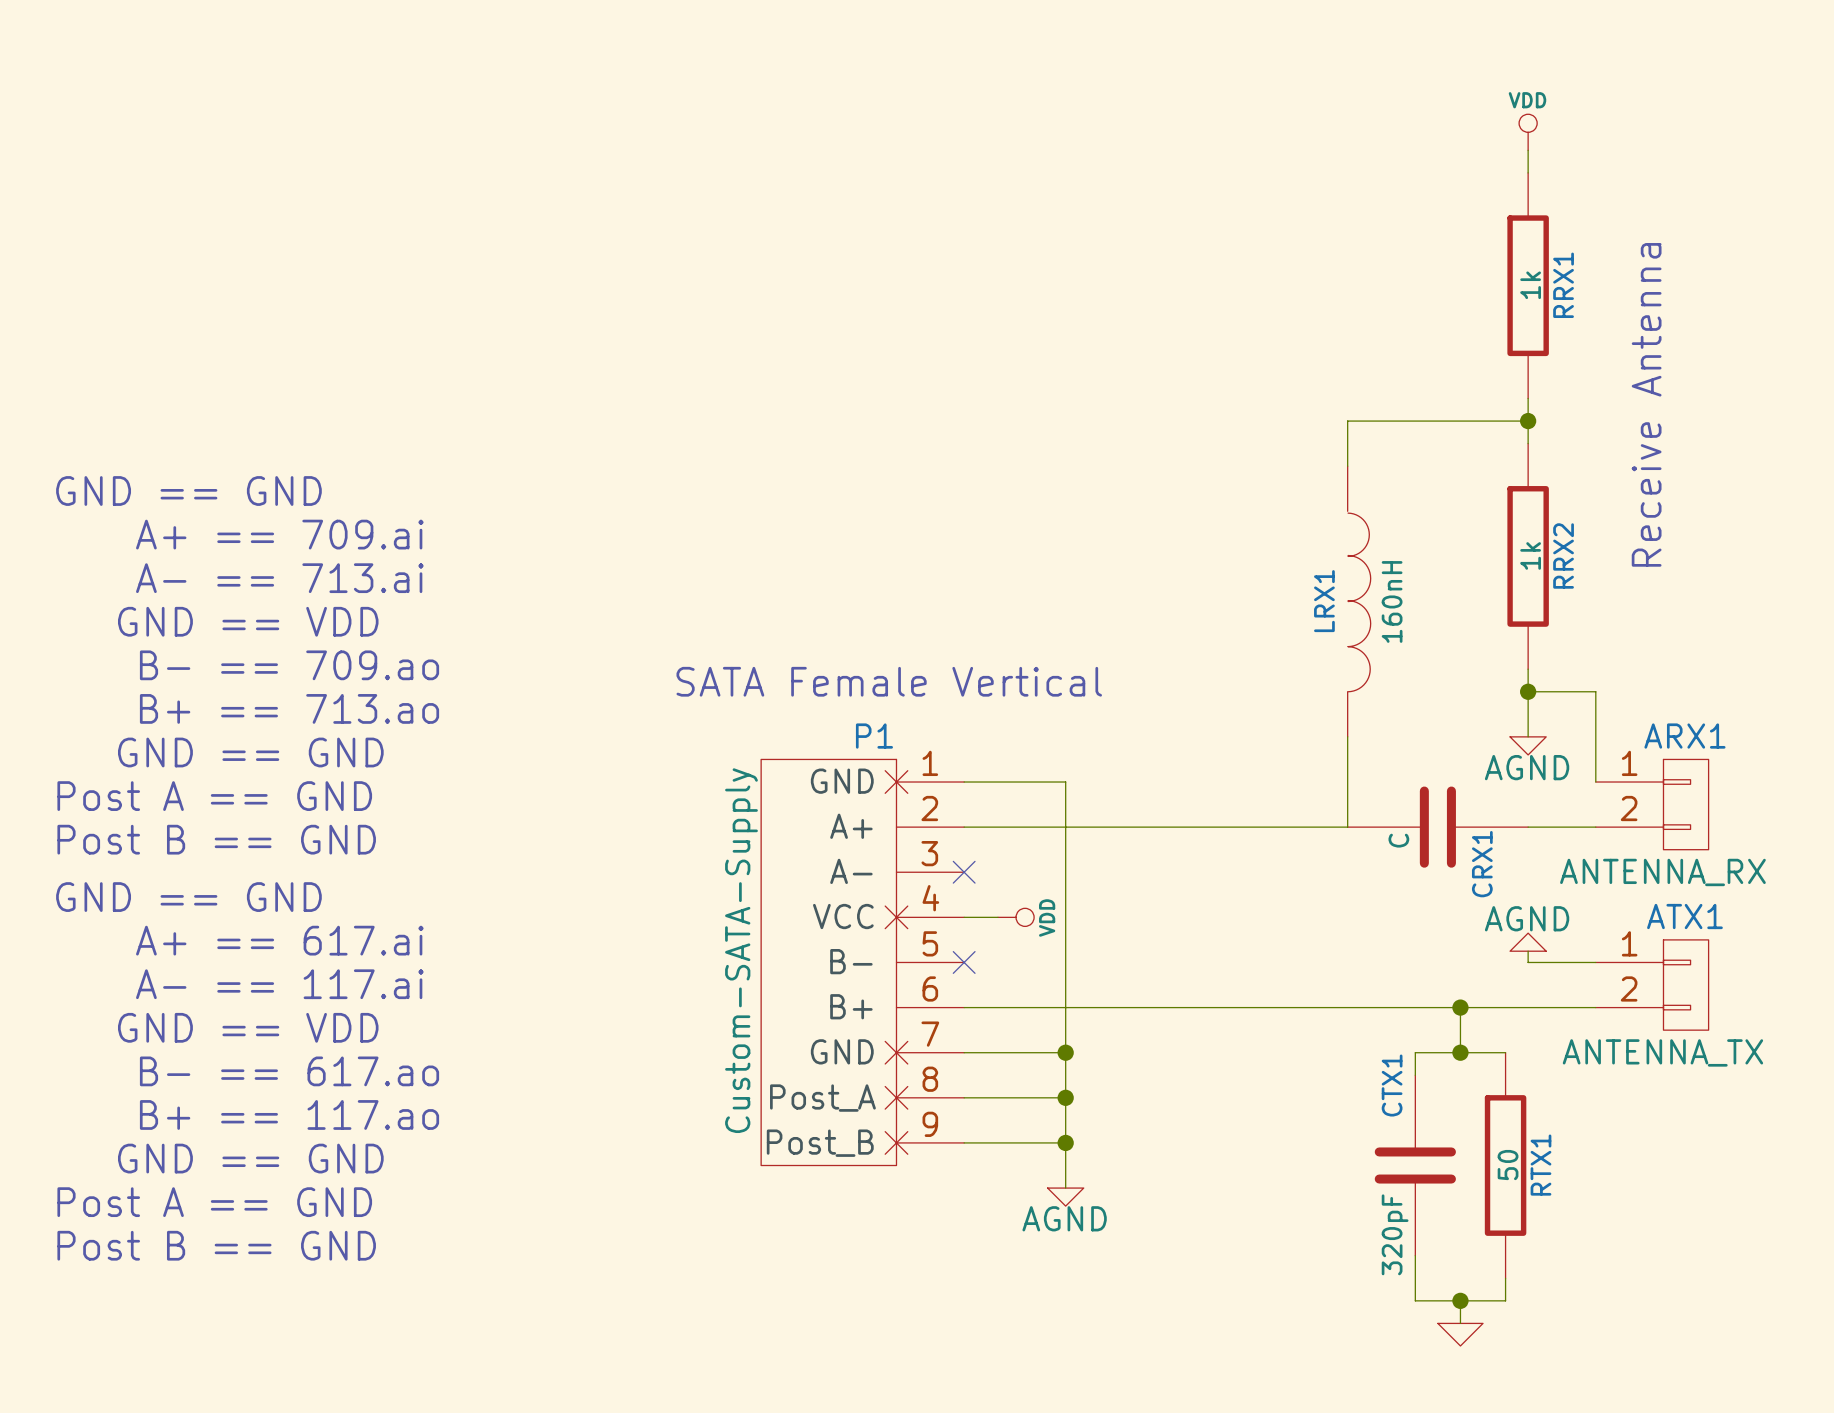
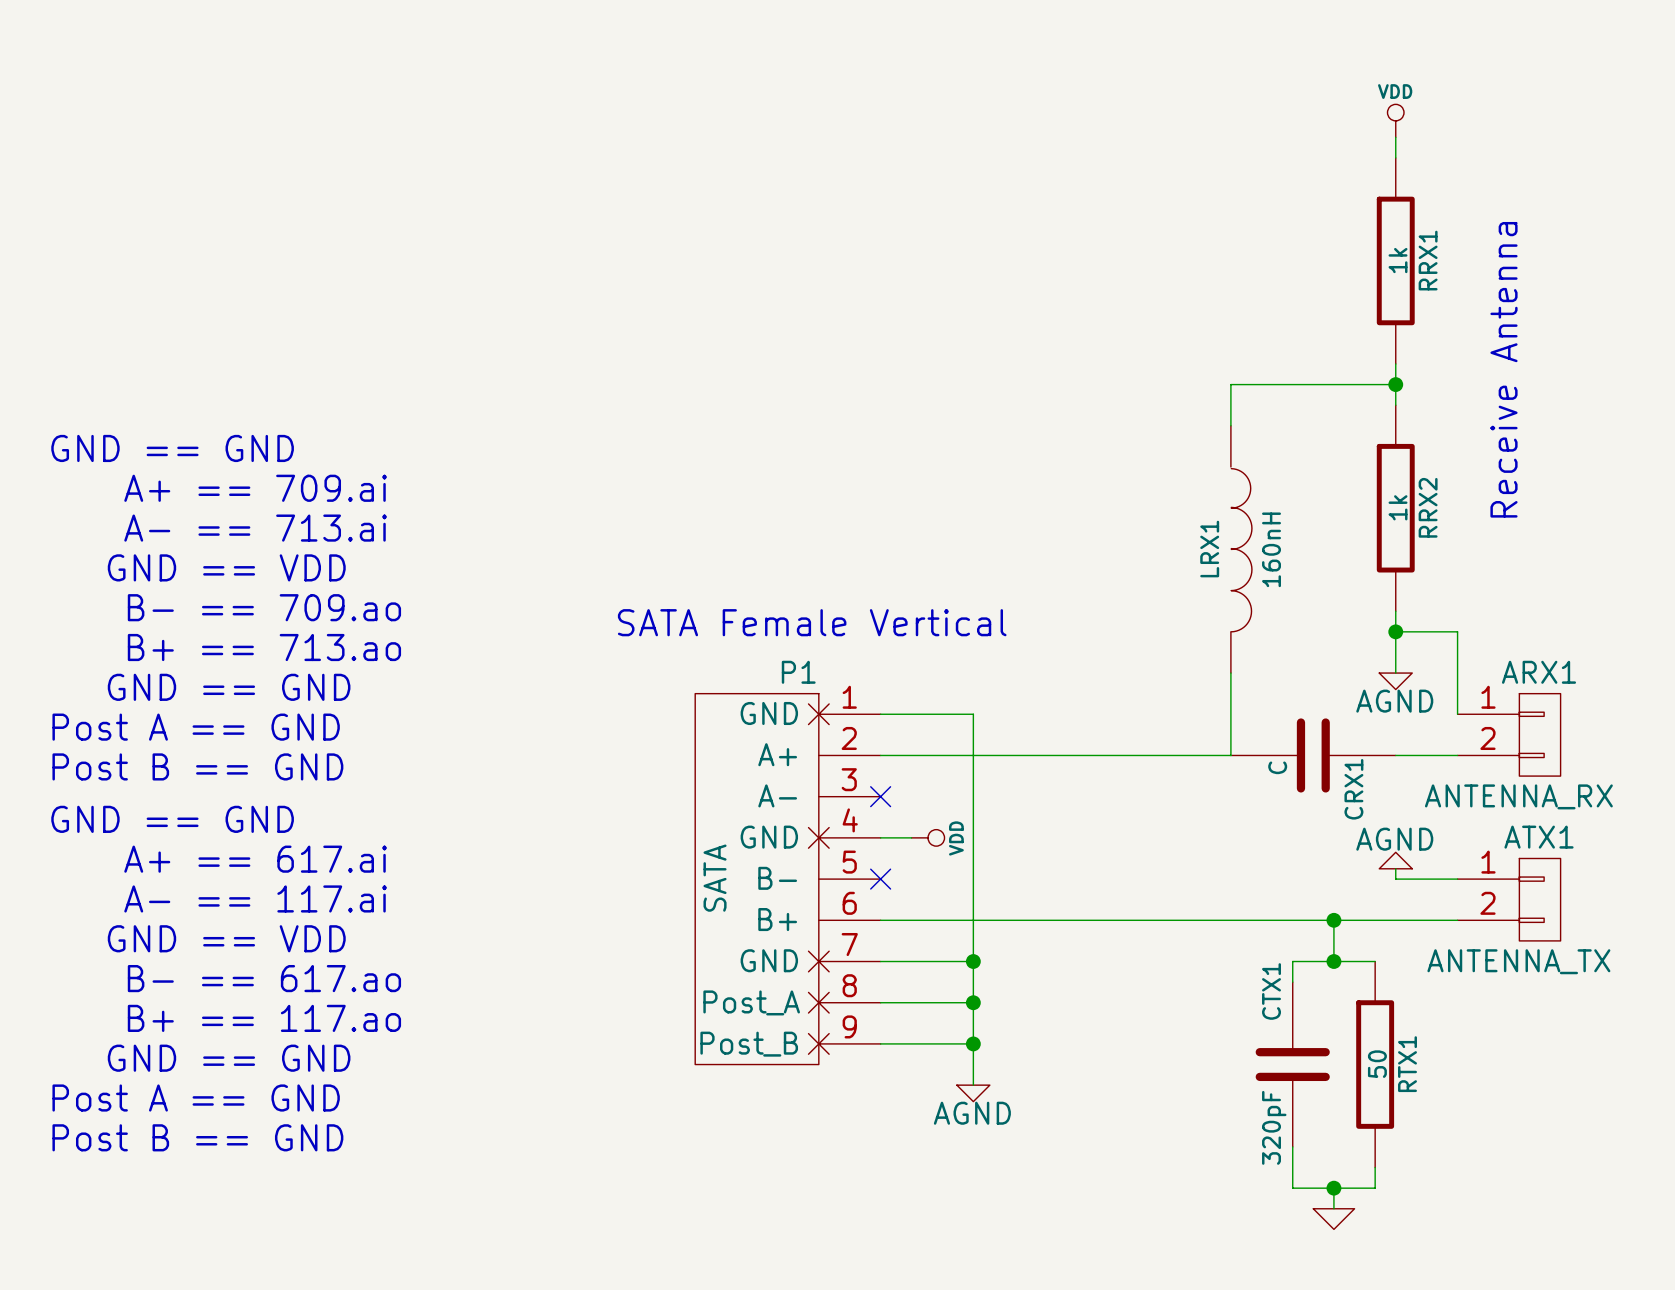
P1 pin name: VCC (843, 916) -> GND (769, 837)
P1 value: Custom-SATA-Supply (741, 950) -> SATA (715, 878)

